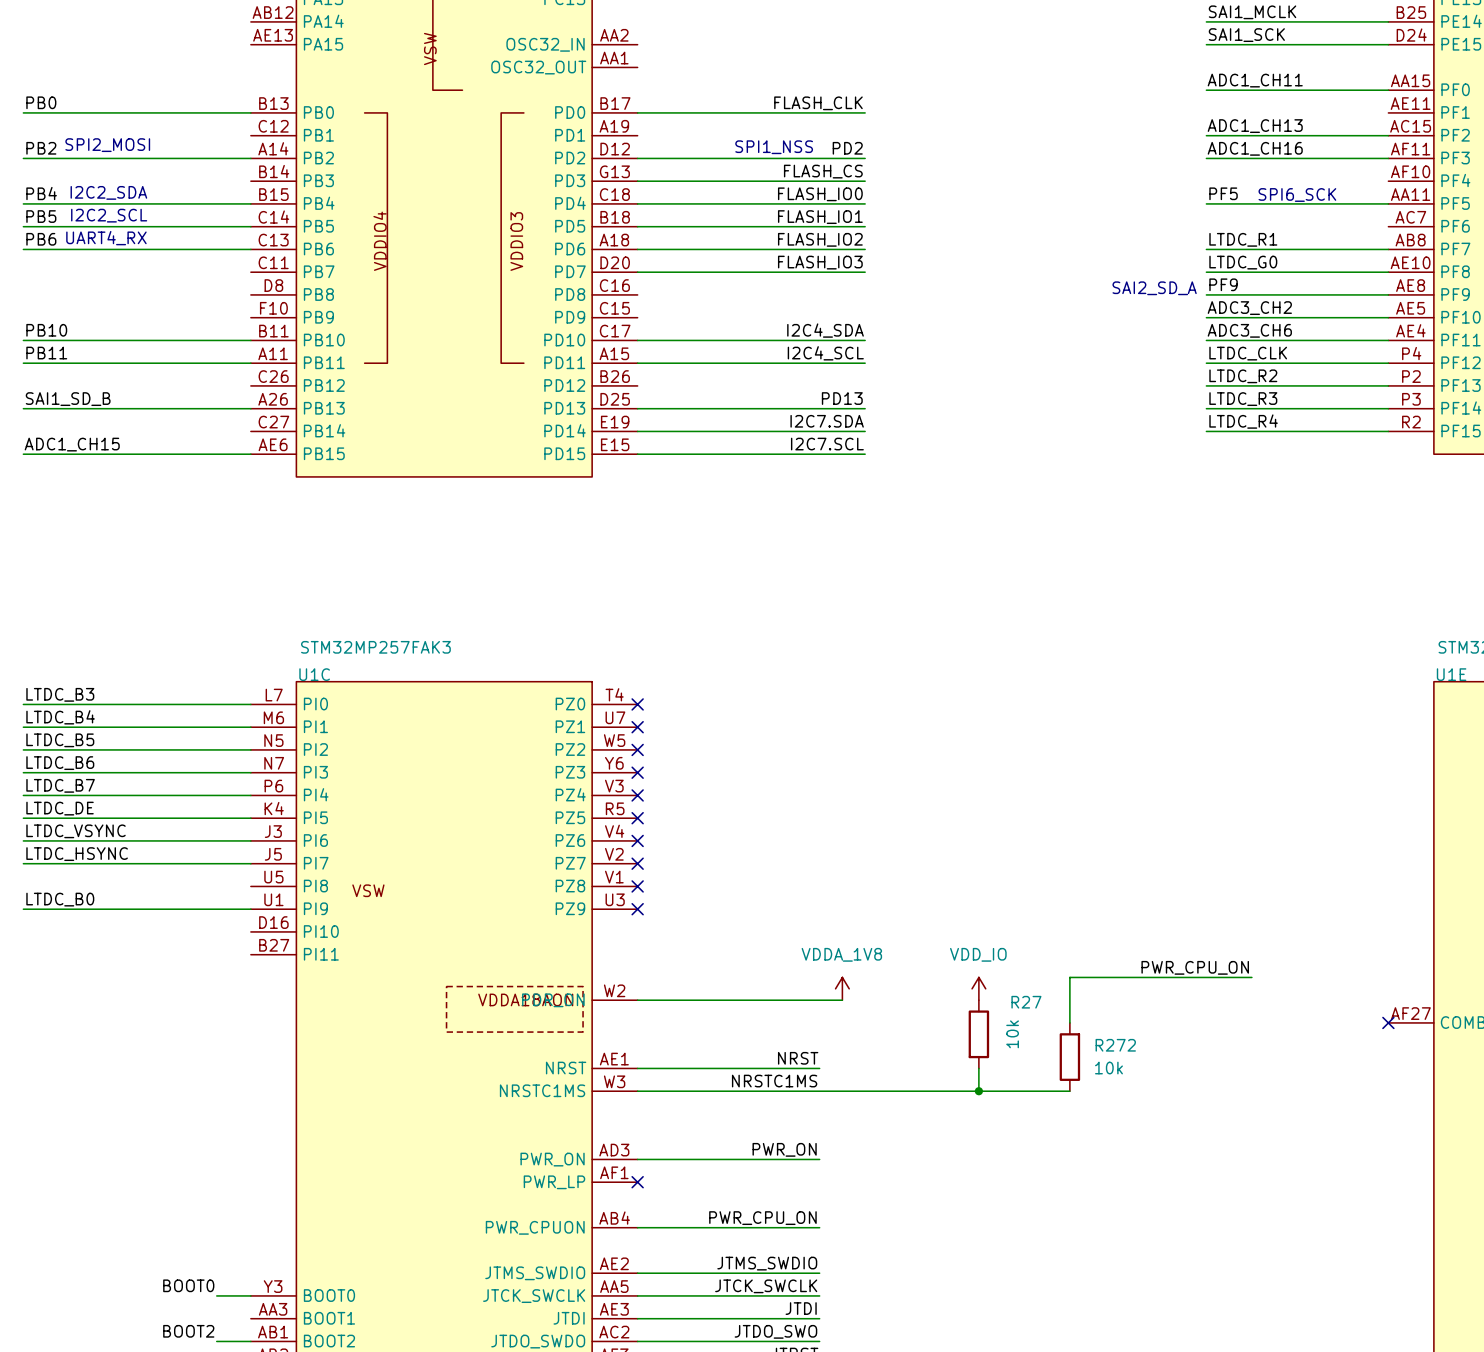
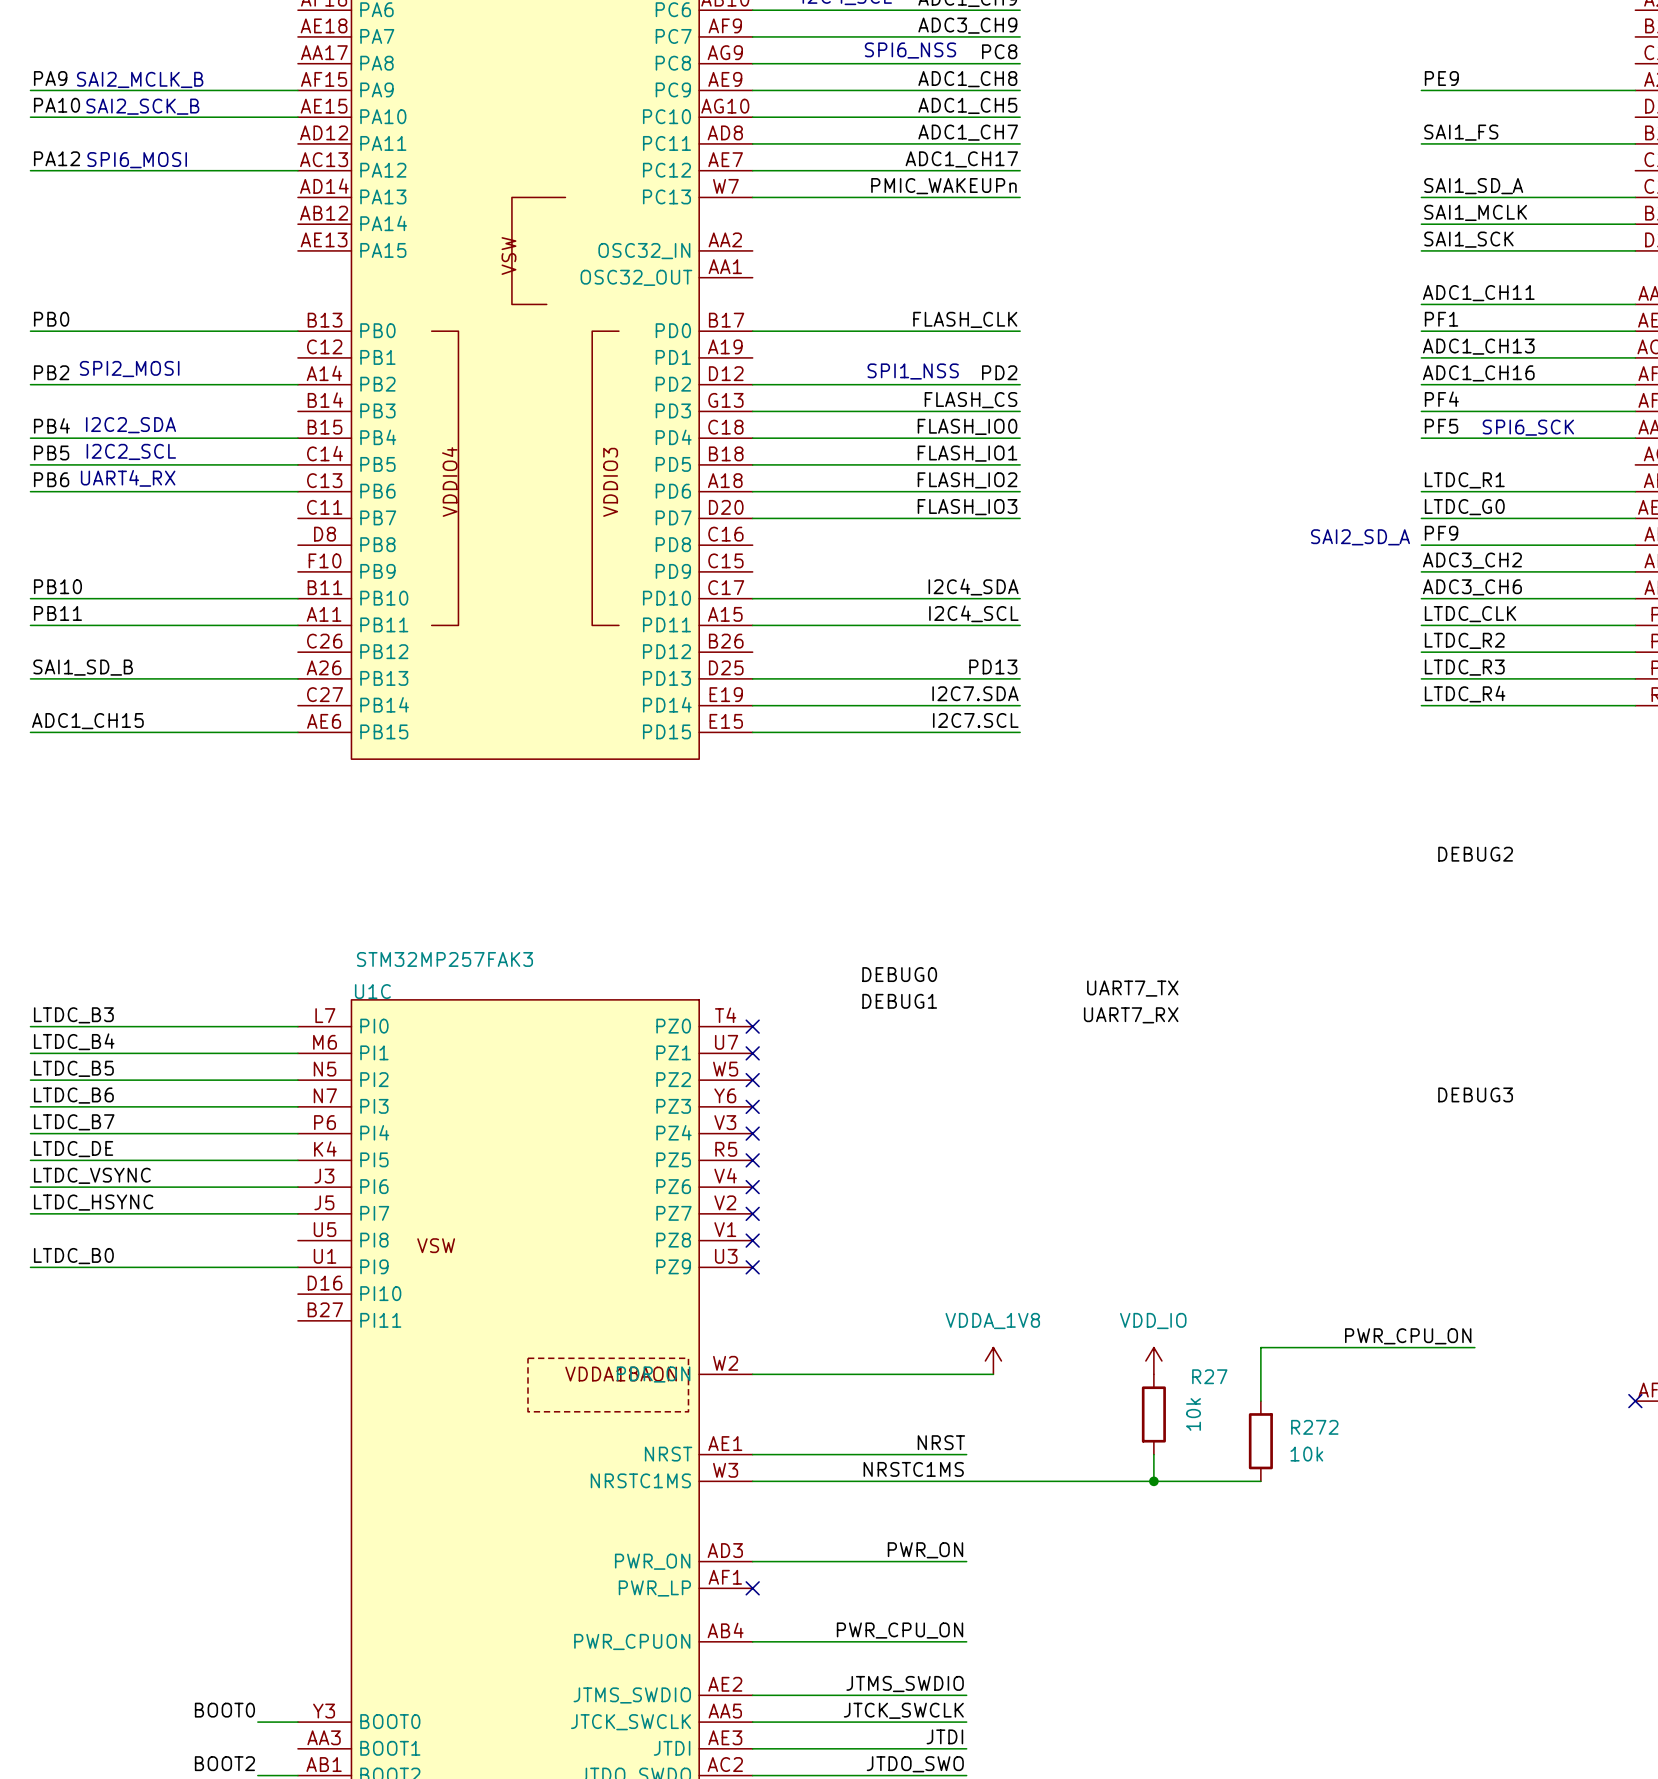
label: none -> PF1 (1441, 319)
wire: none -> (1421, 331) (1635, 331)
label: none -> PF4 (1441, 399)
wire: none -> (1421, 411) (1635, 411)
label: none -> DEBUG2 (1475, 854)
label: none -> DEBUG0 (899, 974)
label: none -> UART7_TX (1132, 988)
label: none -> DEBUG1 (899, 1001)
label: none -> UART7_RX (1131, 1015)
label: none -> DEBUG3 (1475, 1094)

